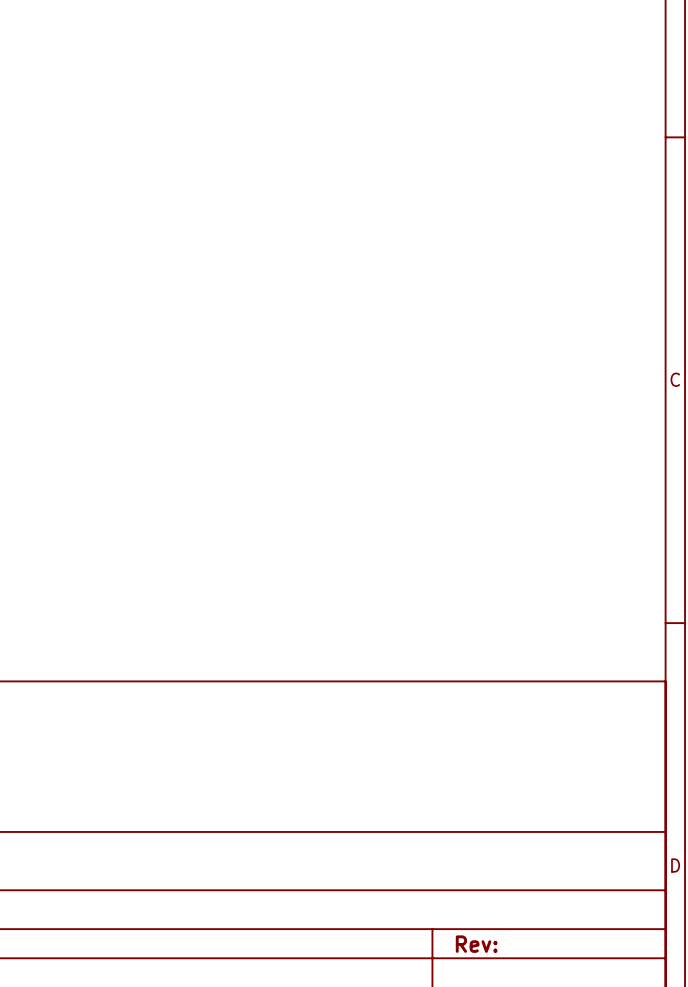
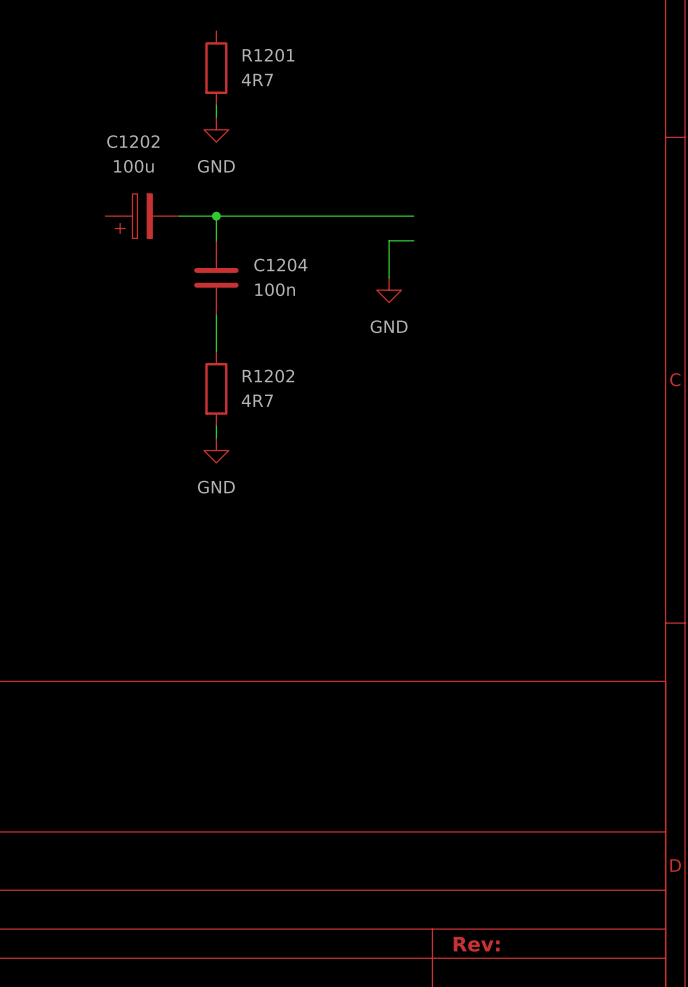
R1201: none -> 4R7 (216, 68)
wire: none -> (216, 105) (216, 117)
power symbol: none -> GND (216, 129)
C1202: none -> 100u (142, 216)
wire: none -> (179, 216) (413, 216)
wire: none -> (216, 216) (216, 240)
junction: none -> (216, 216)
wire: none -> (413, 240) (389, 240) (389, 277)
C1204: none -> 100n (216, 277)
power symbol: none -> GND (389, 290)
wire: none -> (216, 314) (216, 351)
R1202: none -> 4R7 (216, 388)
wire: none -> (216, 425) (216, 438)
power symbol: none -> GND (216, 450)

